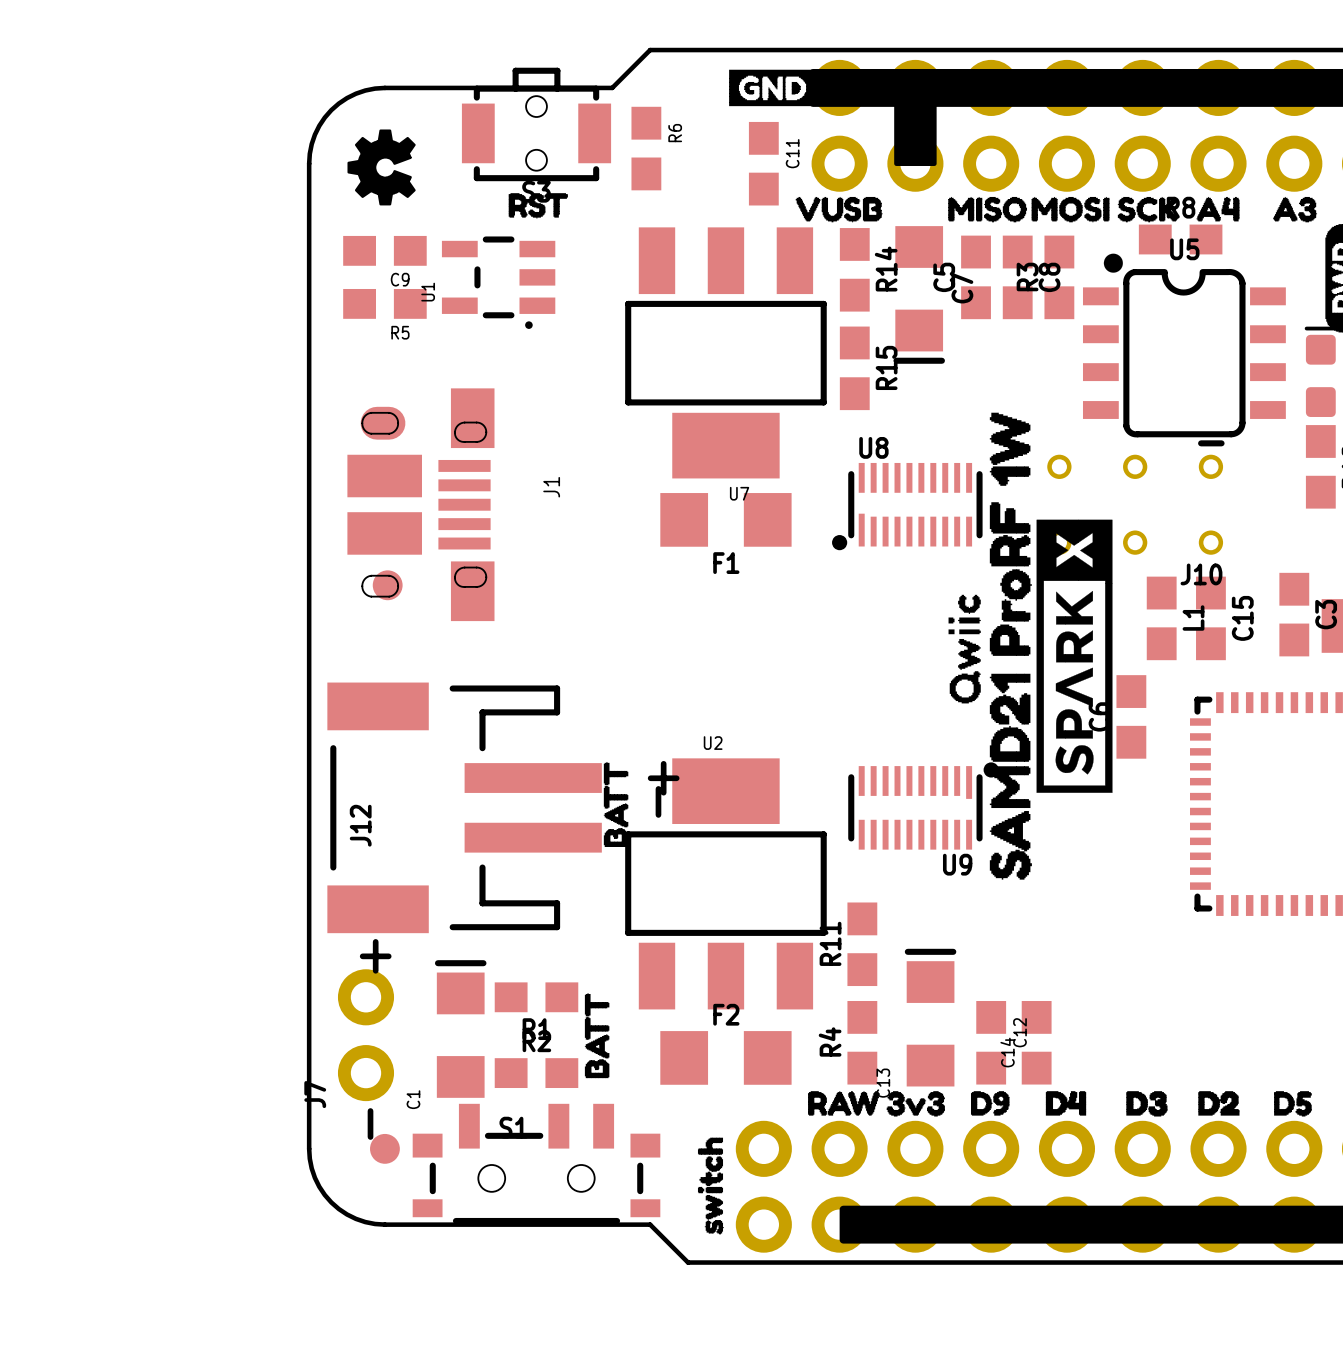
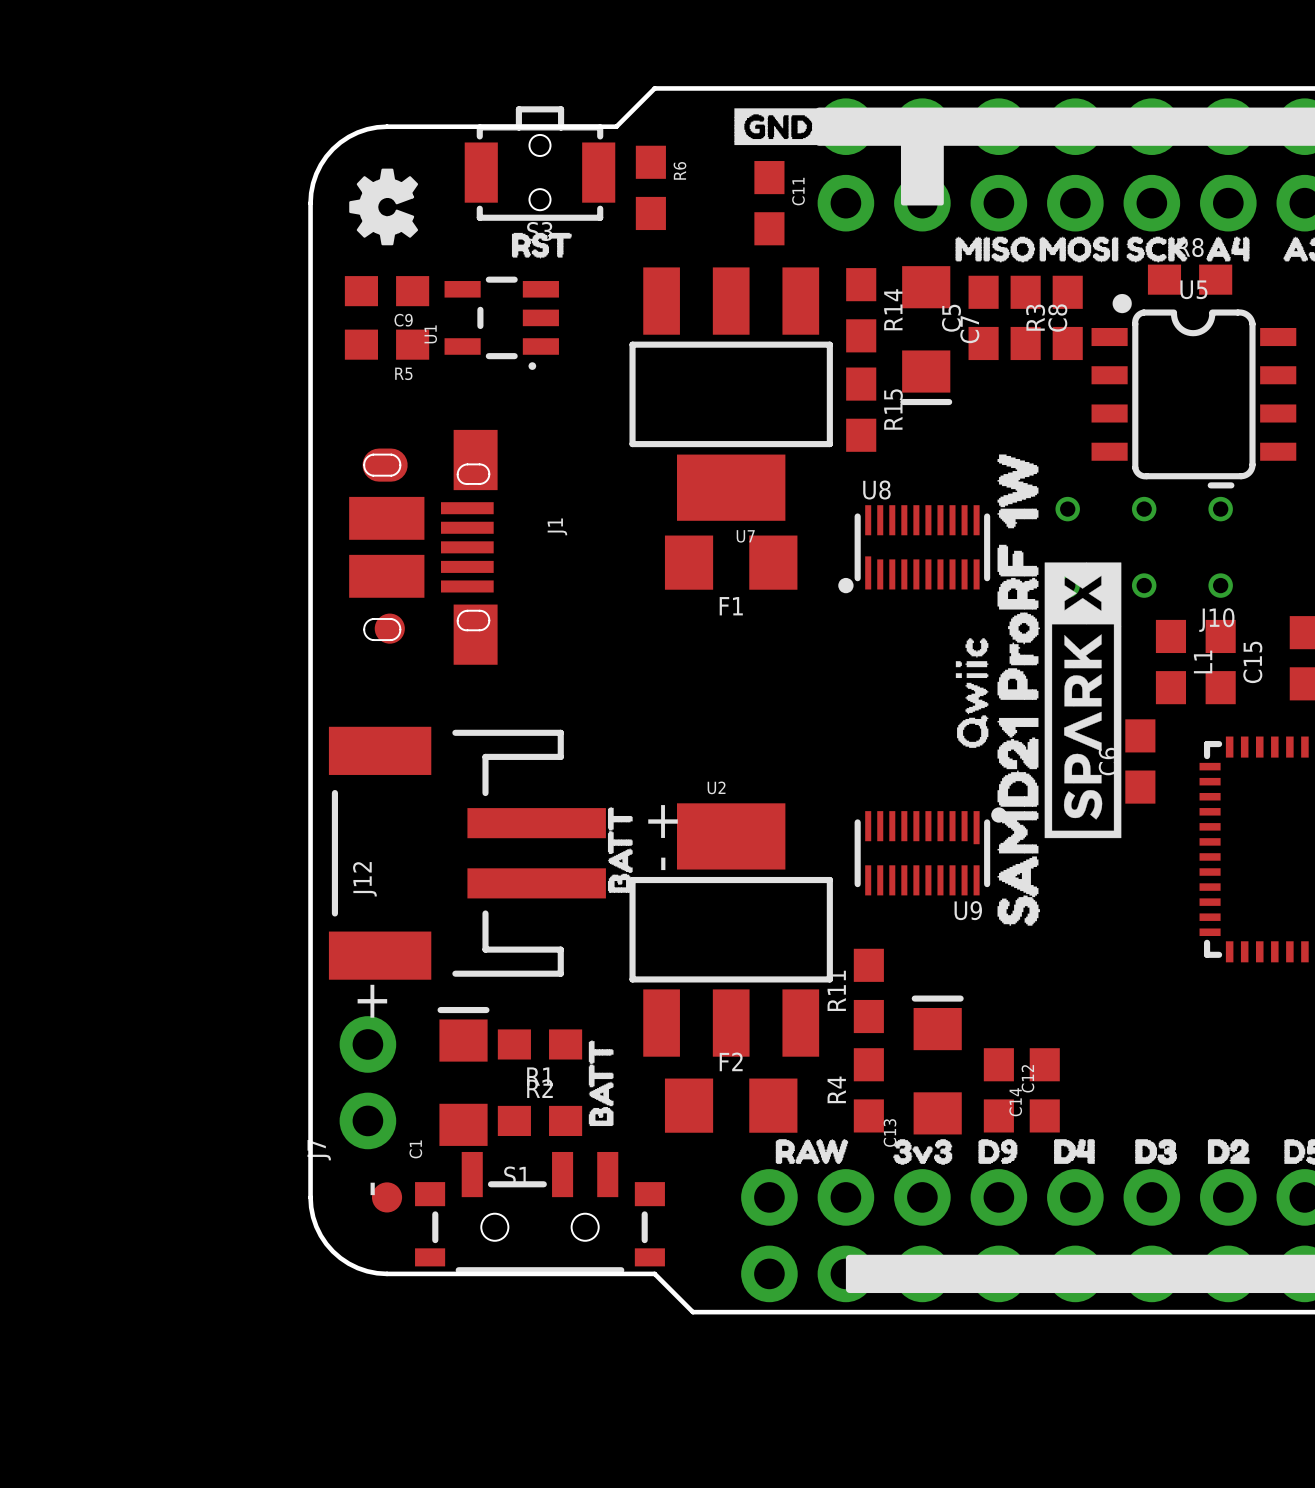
drawing: [795, 196, 883, 223] -> none
drawing position: (843, 1103) -> (811, 1151)
drawing: [697, 1137, 724, 1235] -> none

